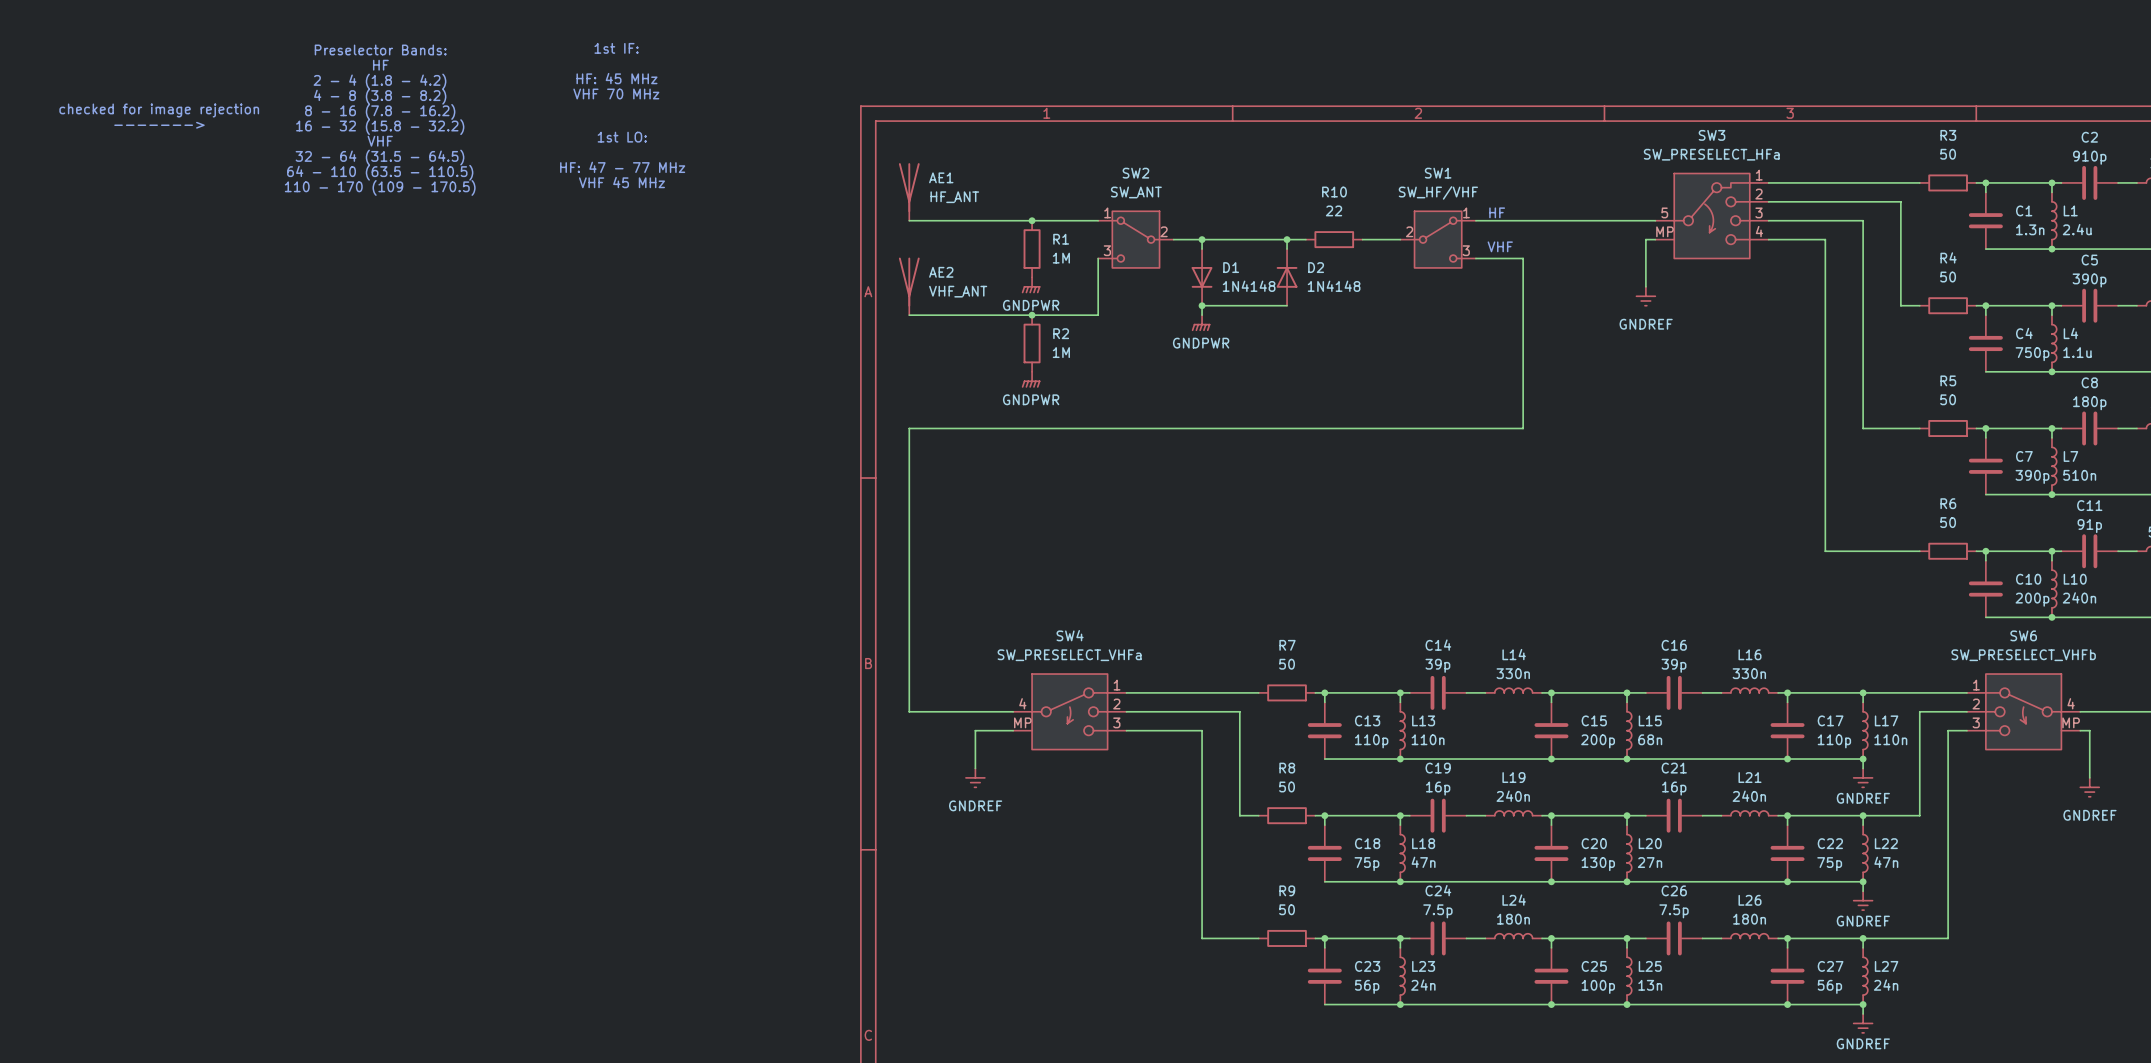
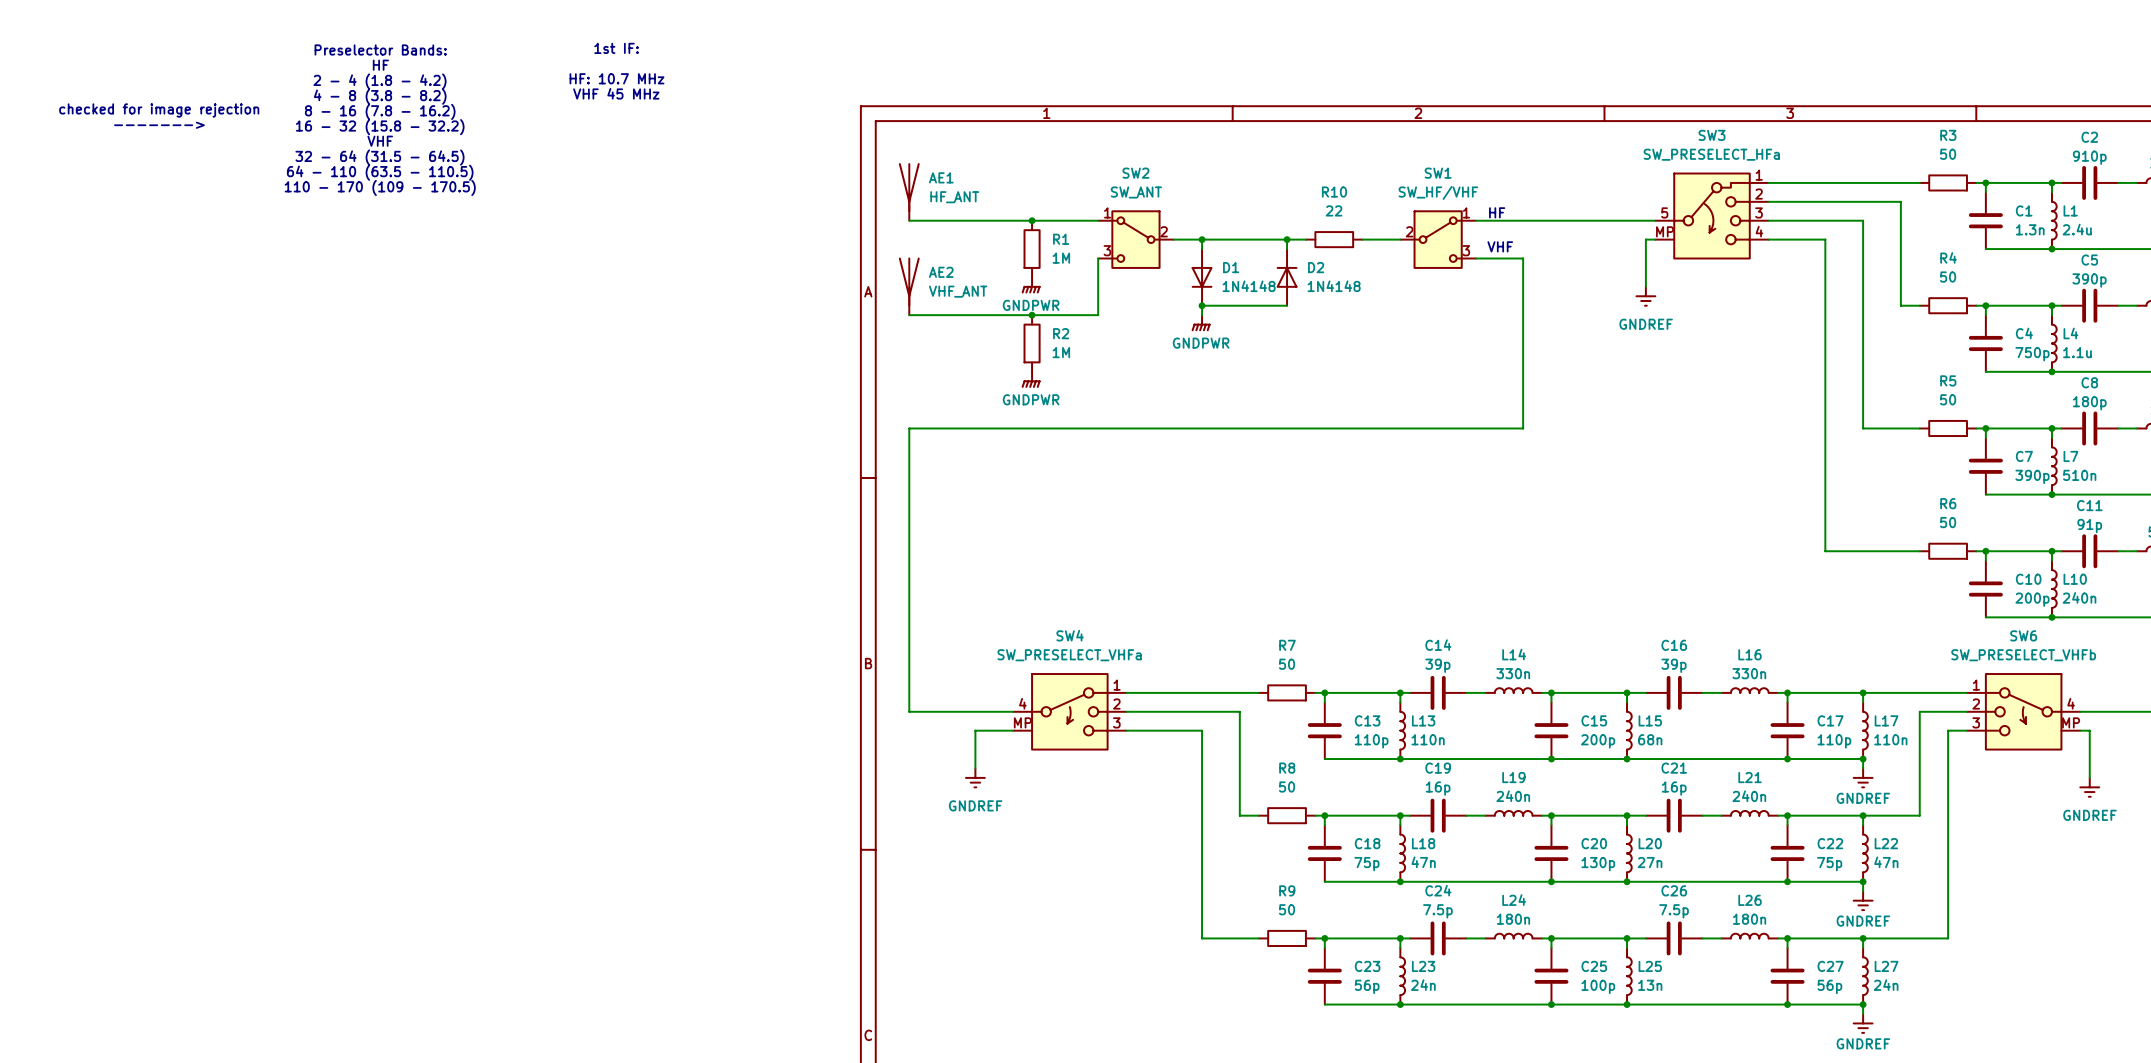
text: HF: 45 MHz (616, 78) -> HF: 10.7 MHz (616, 78)
text: VHF 70 MHz (616, 93) -> VHF 45 MHz (616, 93)
text: 1st LO: (622, 137) -> none
text: HF: 47 - 77 MHz (622, 167) -> none
text: VHF 45 MHz (621, 182) -> none

